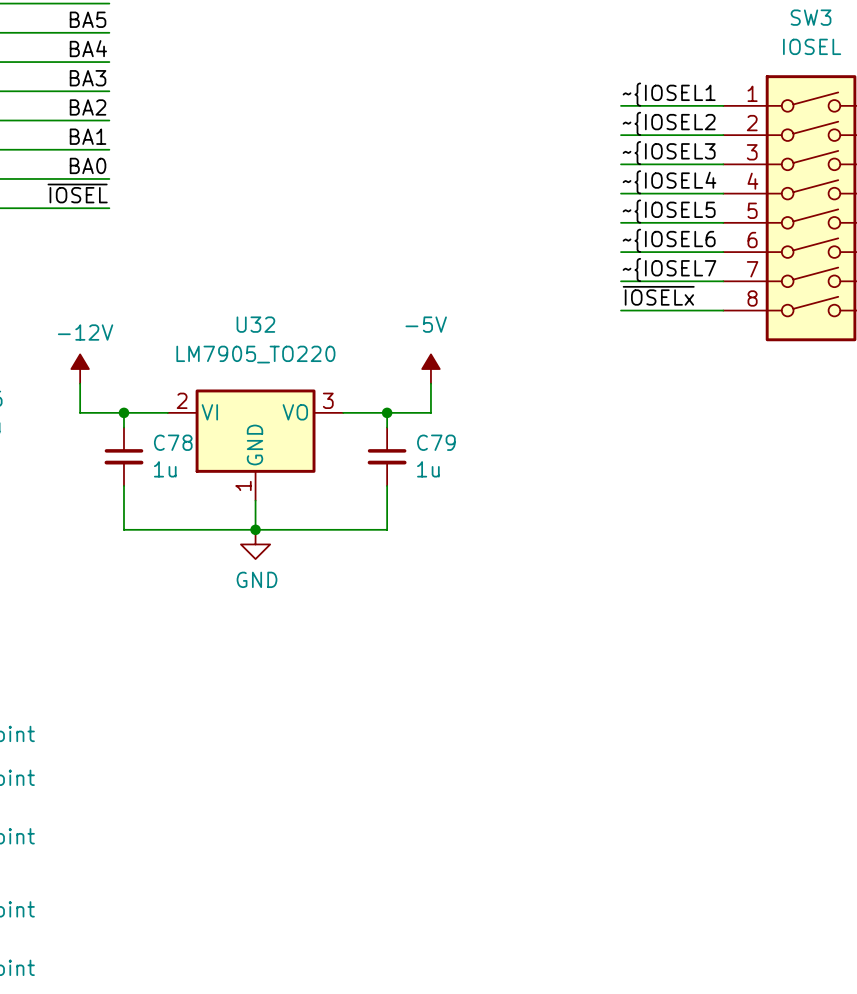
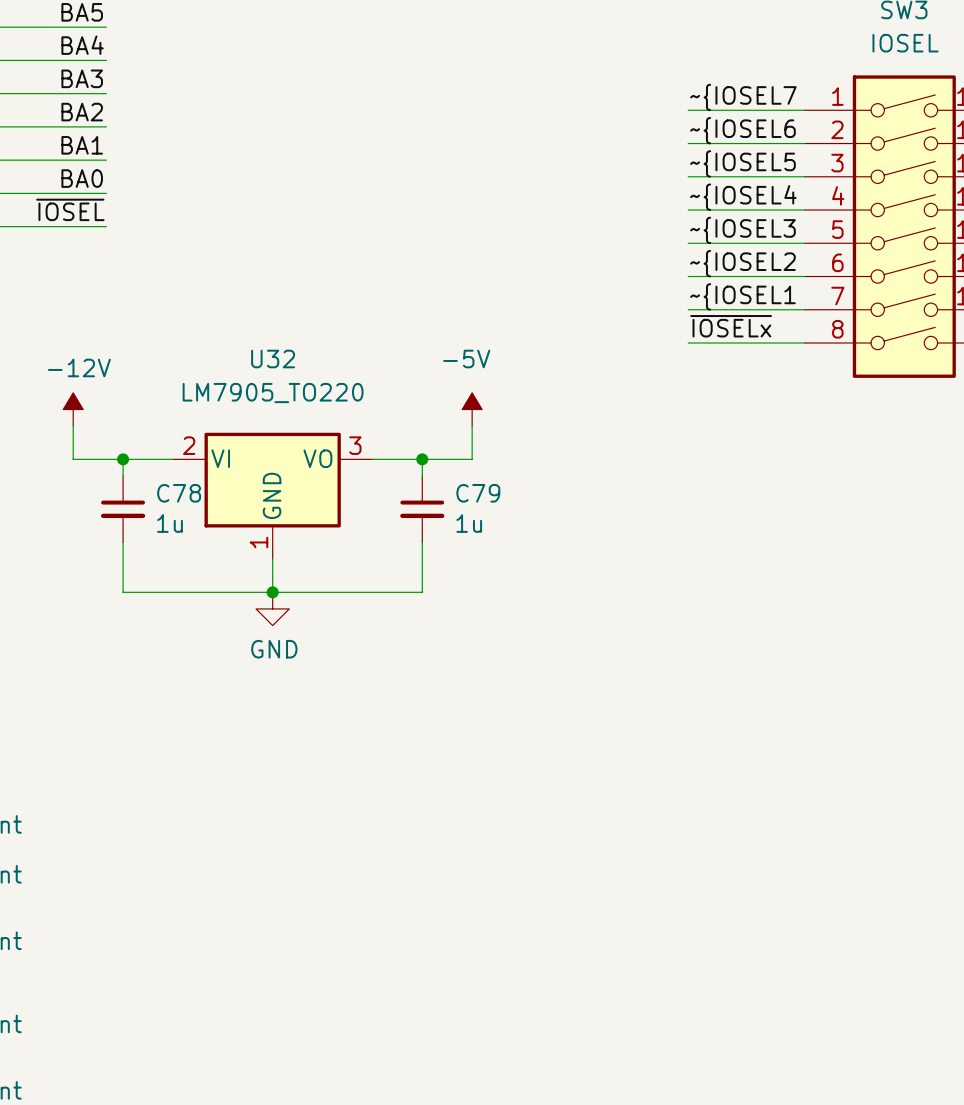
label: ~{IOSEL1 (669, 94) -> ~{IOSEL7 (743, 97)
label: ~{IOSEL2 (669, 123) -> ~{IOSEL6 (742, 130)
label: ~{IOSEL3 (669, 153) -> ~{IOSEL5 (742, 163)
label: ~{IOSEL5 (669, 211) -> ~{IOSEL3 (742, 230)
label: ~{IOSEL6 (669, 240) -> ~{IOSEL2 (742, 263)
label: ~{IOSEL7 (669, 270) -> ~{IOSEL1 (742, 296)

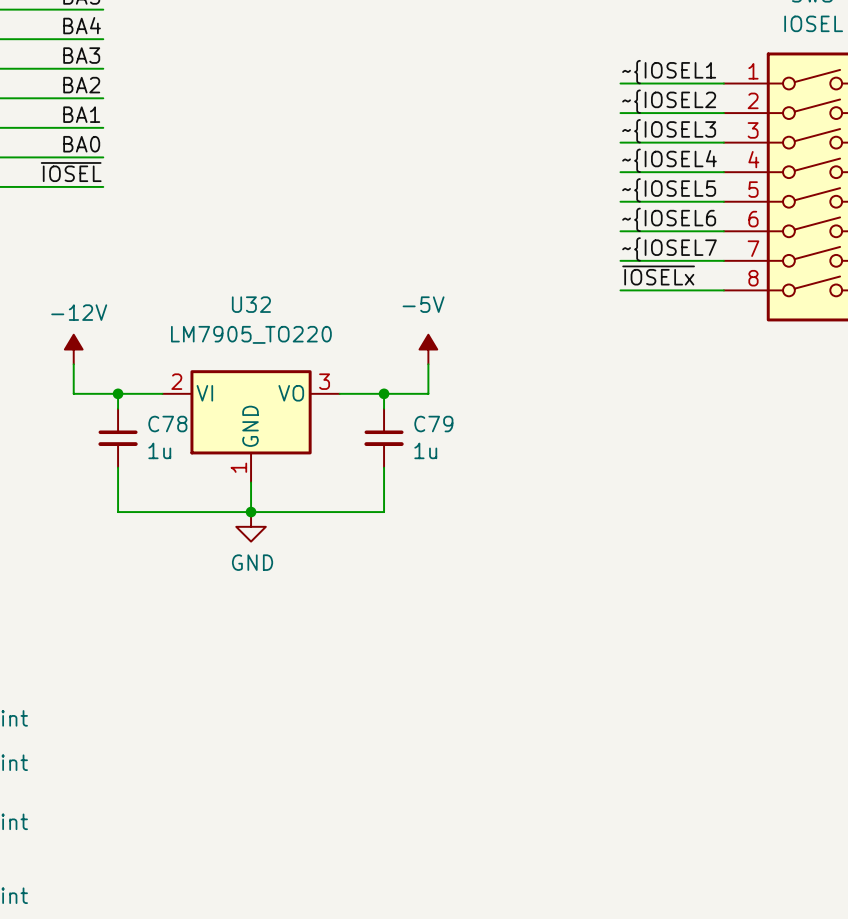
label: ~{IOSEL7 (743, 97) -> ~{IOSEL1 (669, 72)
label: ~{IOSEL6 (742, 130) -> ~{IOSEL2 (669, 101)
label: ~{IOSEL5 (742, 163) -> ~{IOSEL3 (669, 131)
label: ~{IOSEL3 (742, 230) -> ~{IOSEL5 (669, 190)
label: ~{IOSEL2 (742, 263) -> ~{IOSEL6 (669, 219)
label: ~{IOSEL1 (742, 296) -> ~{IOSEL7 (669, 249)

